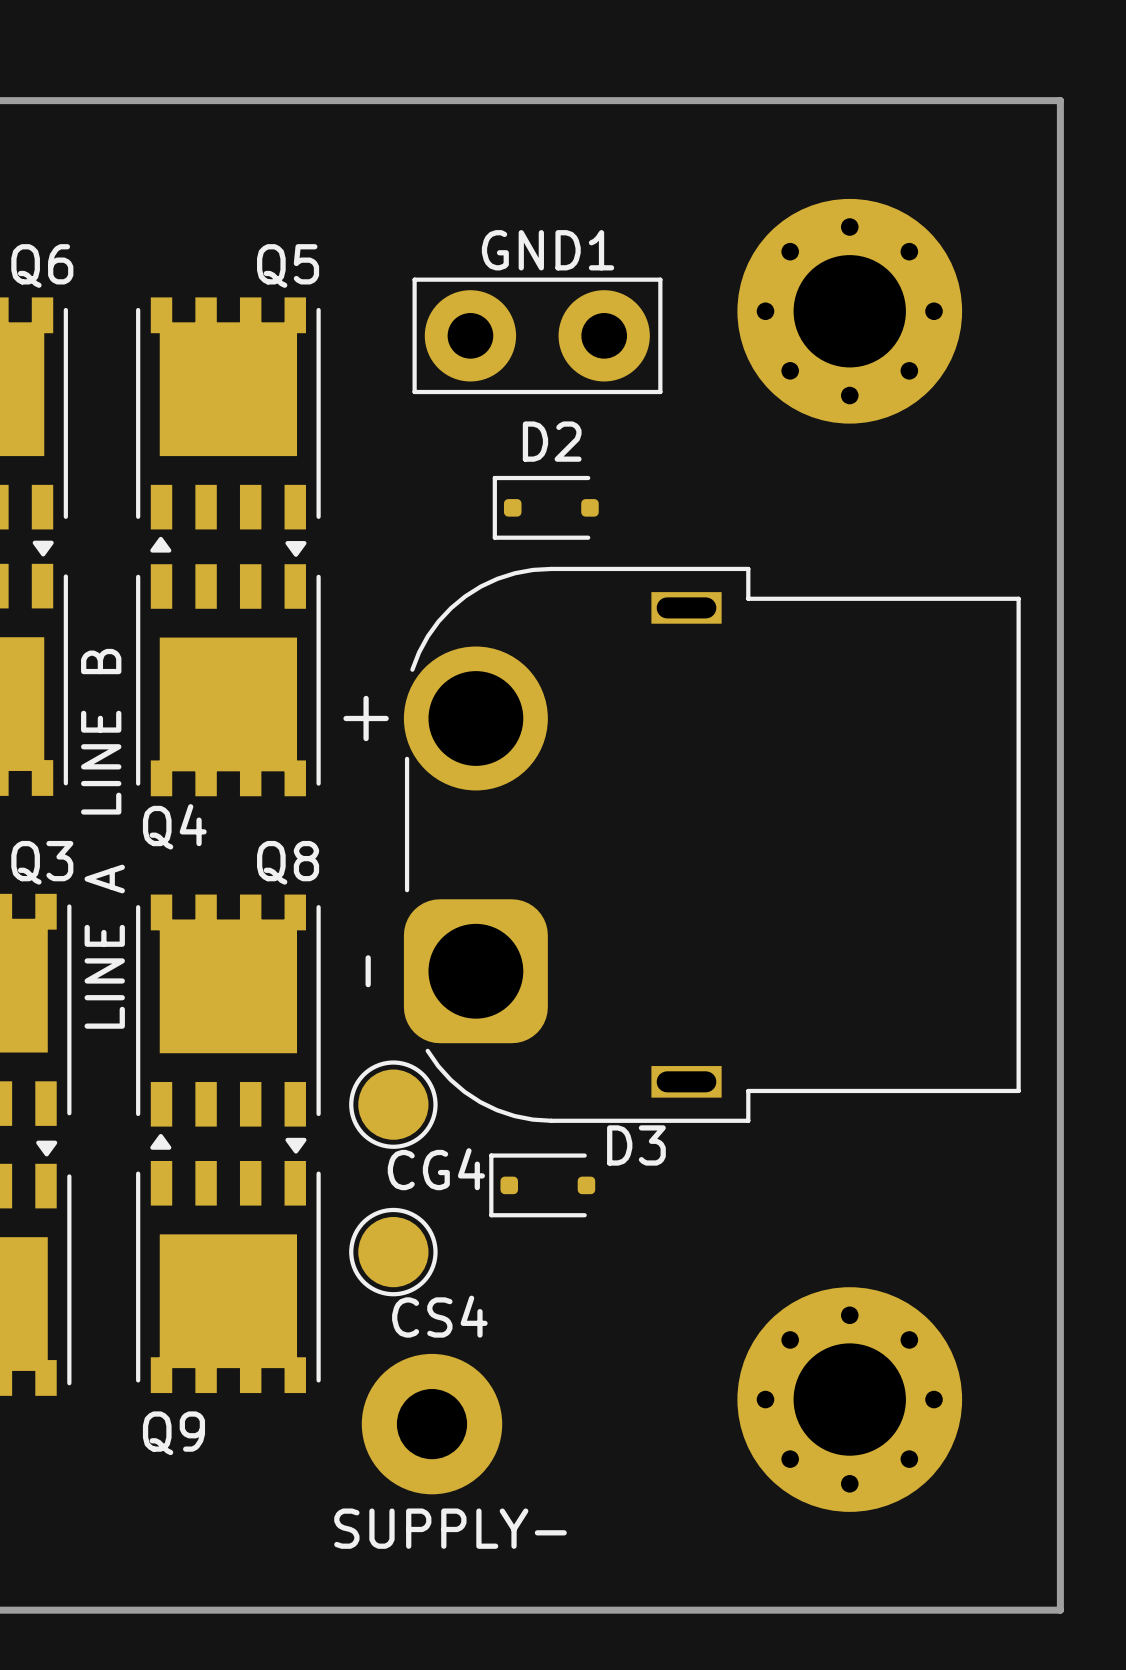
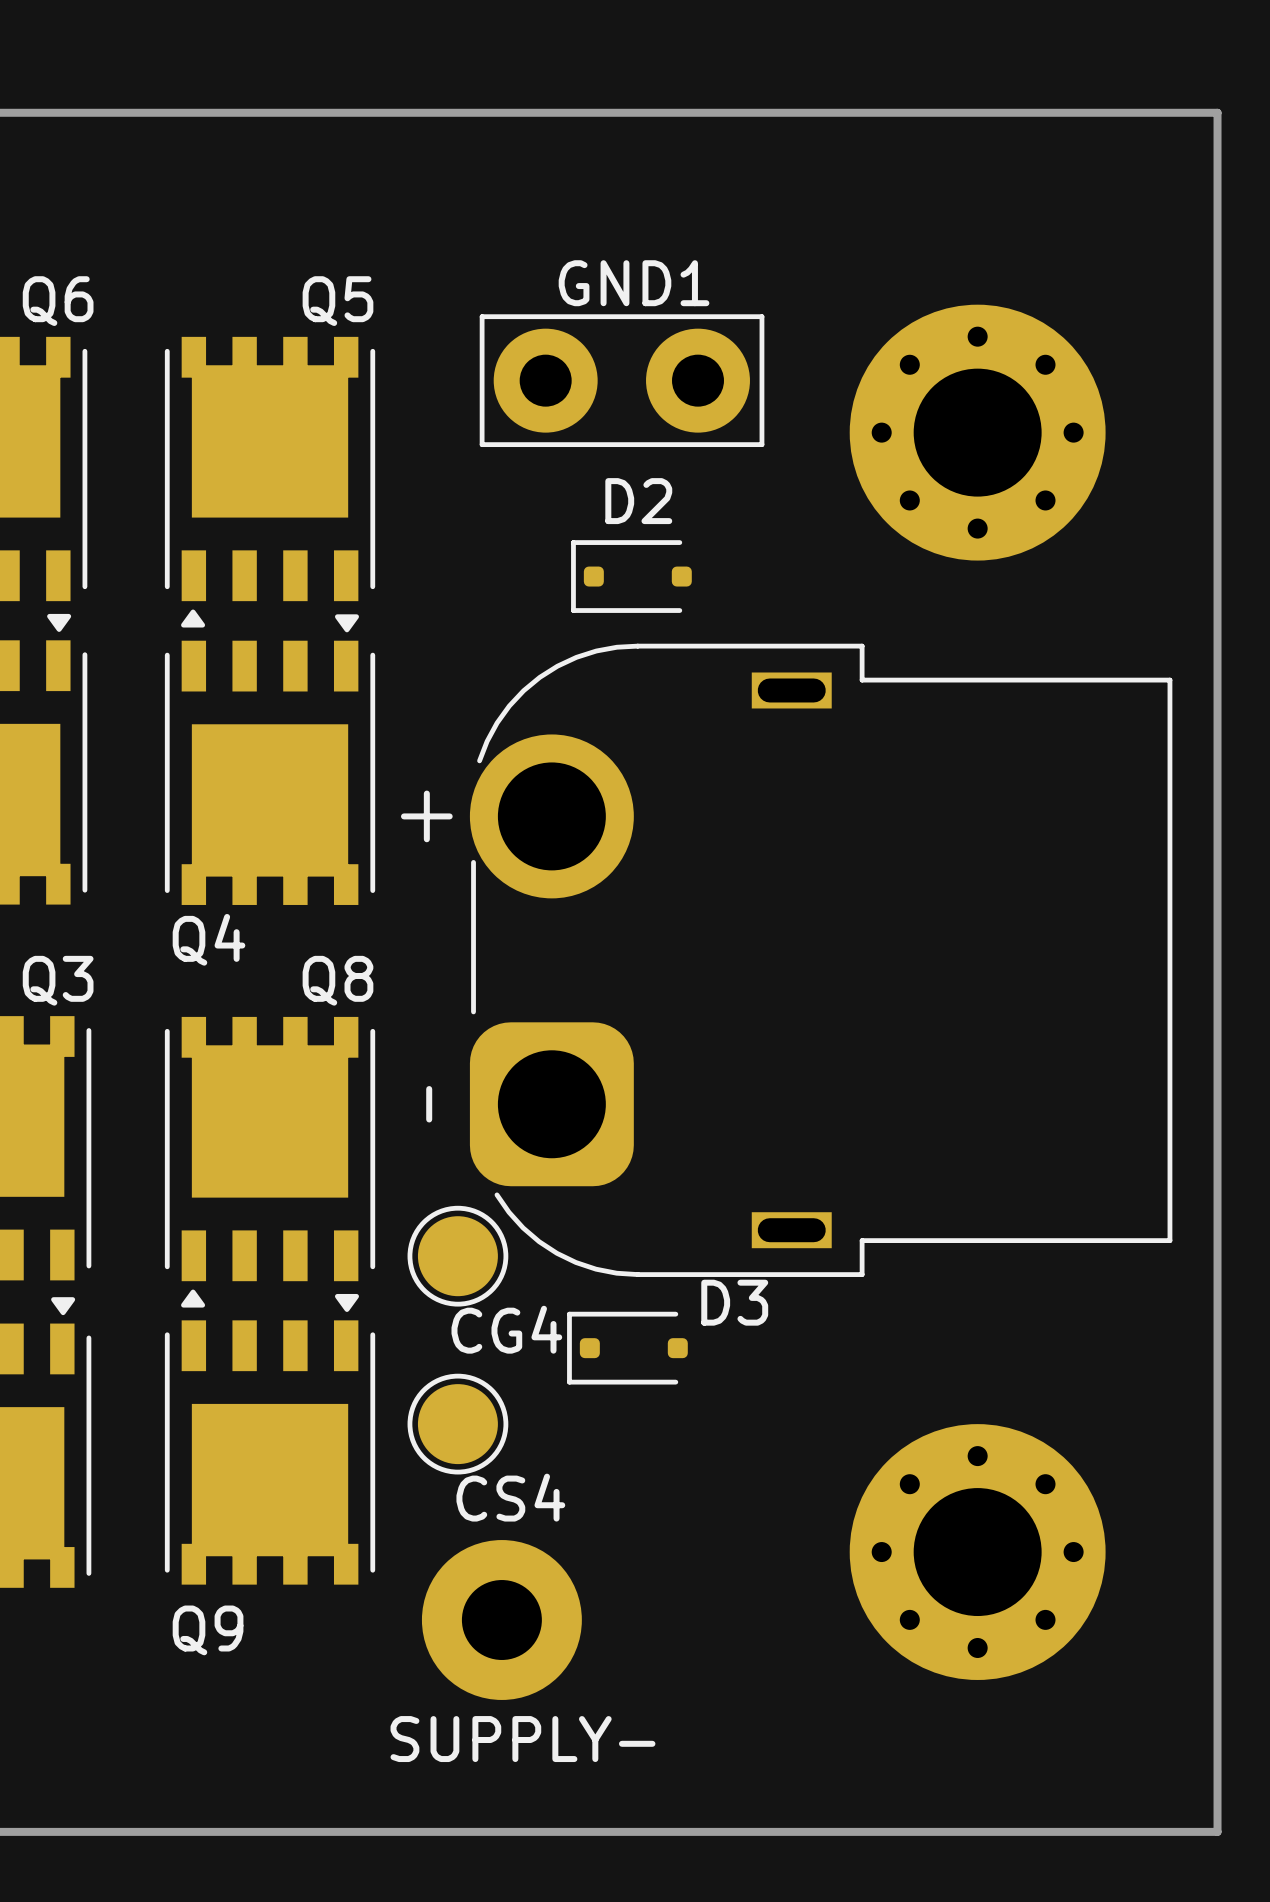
part position: (849, 311) -> (977, 432)
text: LINE B (101, 731) -> none
text: LINE A (104, 946) -> none
part position: (849, 1399) -> (977, 1552)

